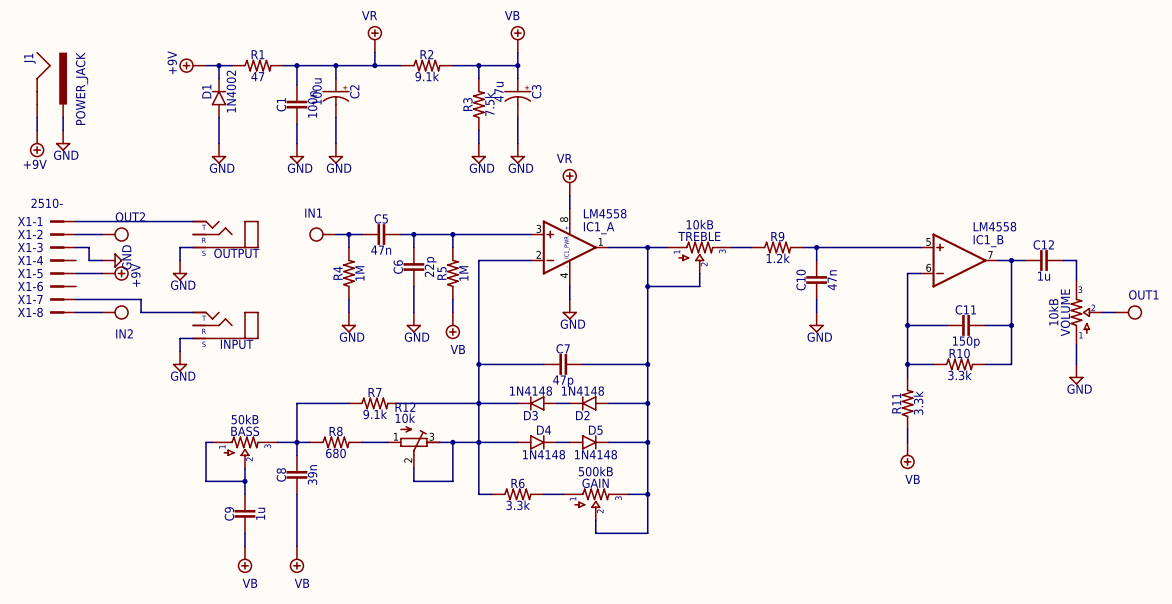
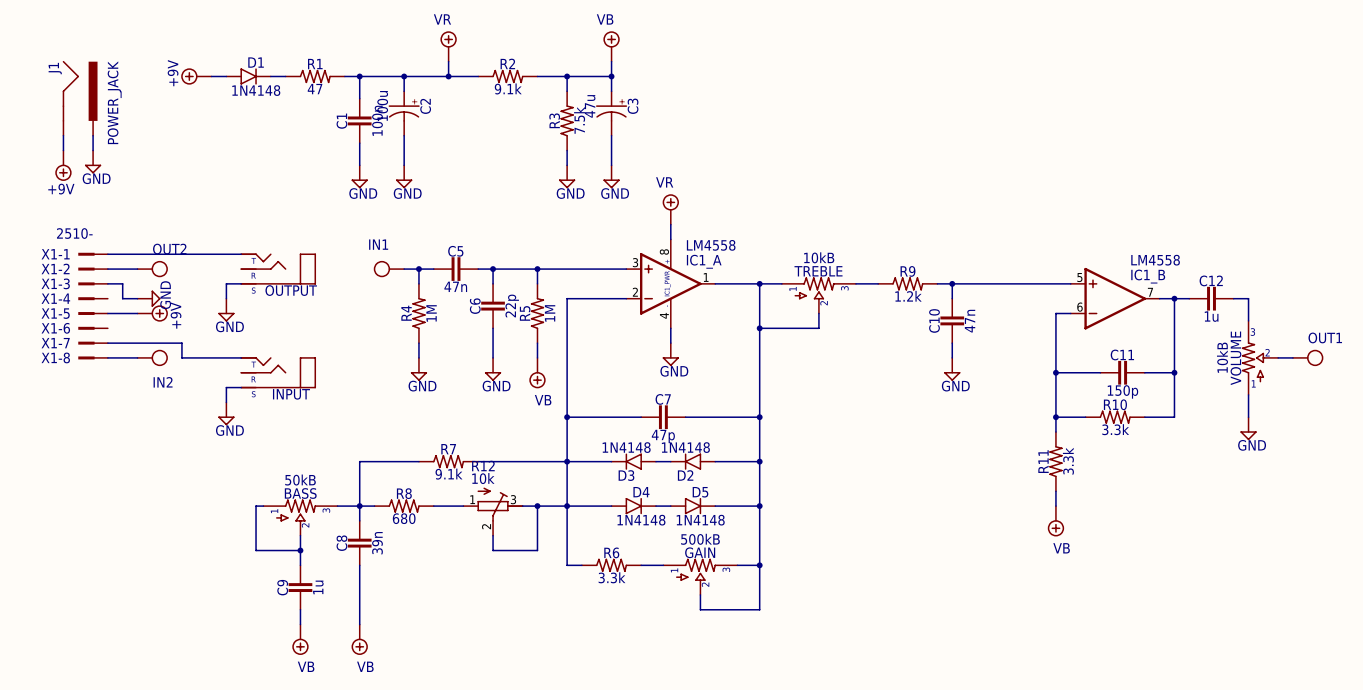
wire: none -> (211, 76) (226, 76)
power symbol position: +9V (192, 65) -> +9V (196, 76)
junction: (219, 65) -> none
D1 value: 1N4002 (231, 91) -> 1N4148 (256, 90)
D1 rotation: 0° (219, 98) -> 90° clockwise (248, 76)
D1 position: (219, 98) -> (248, 76)
wire: (219, 117) (219, 143) -> none
power symbol: GND (219, 153) -> none

